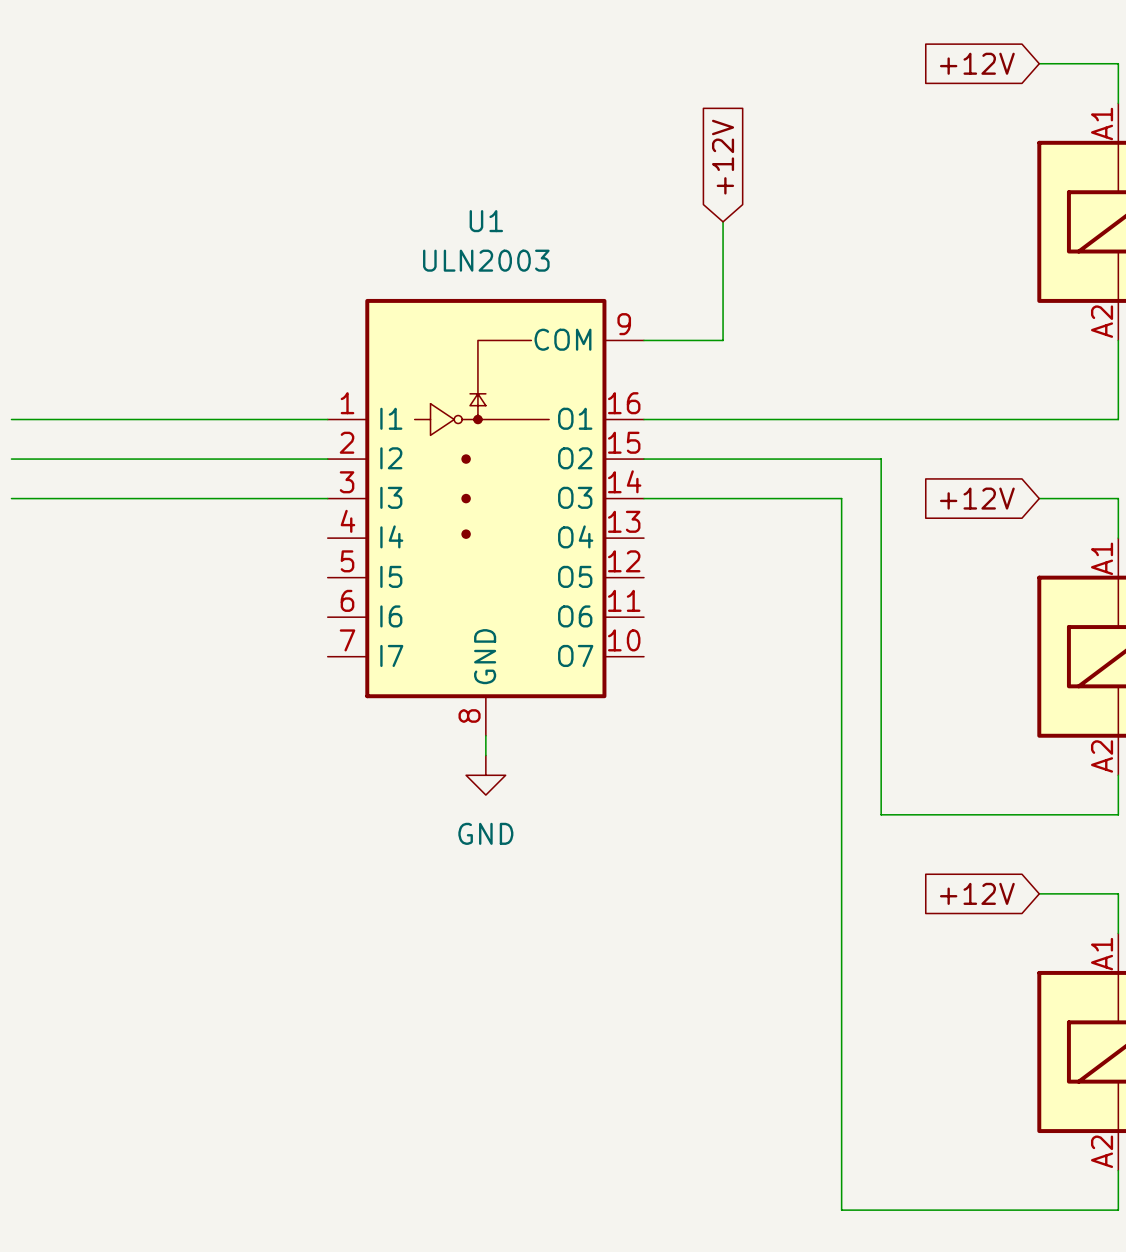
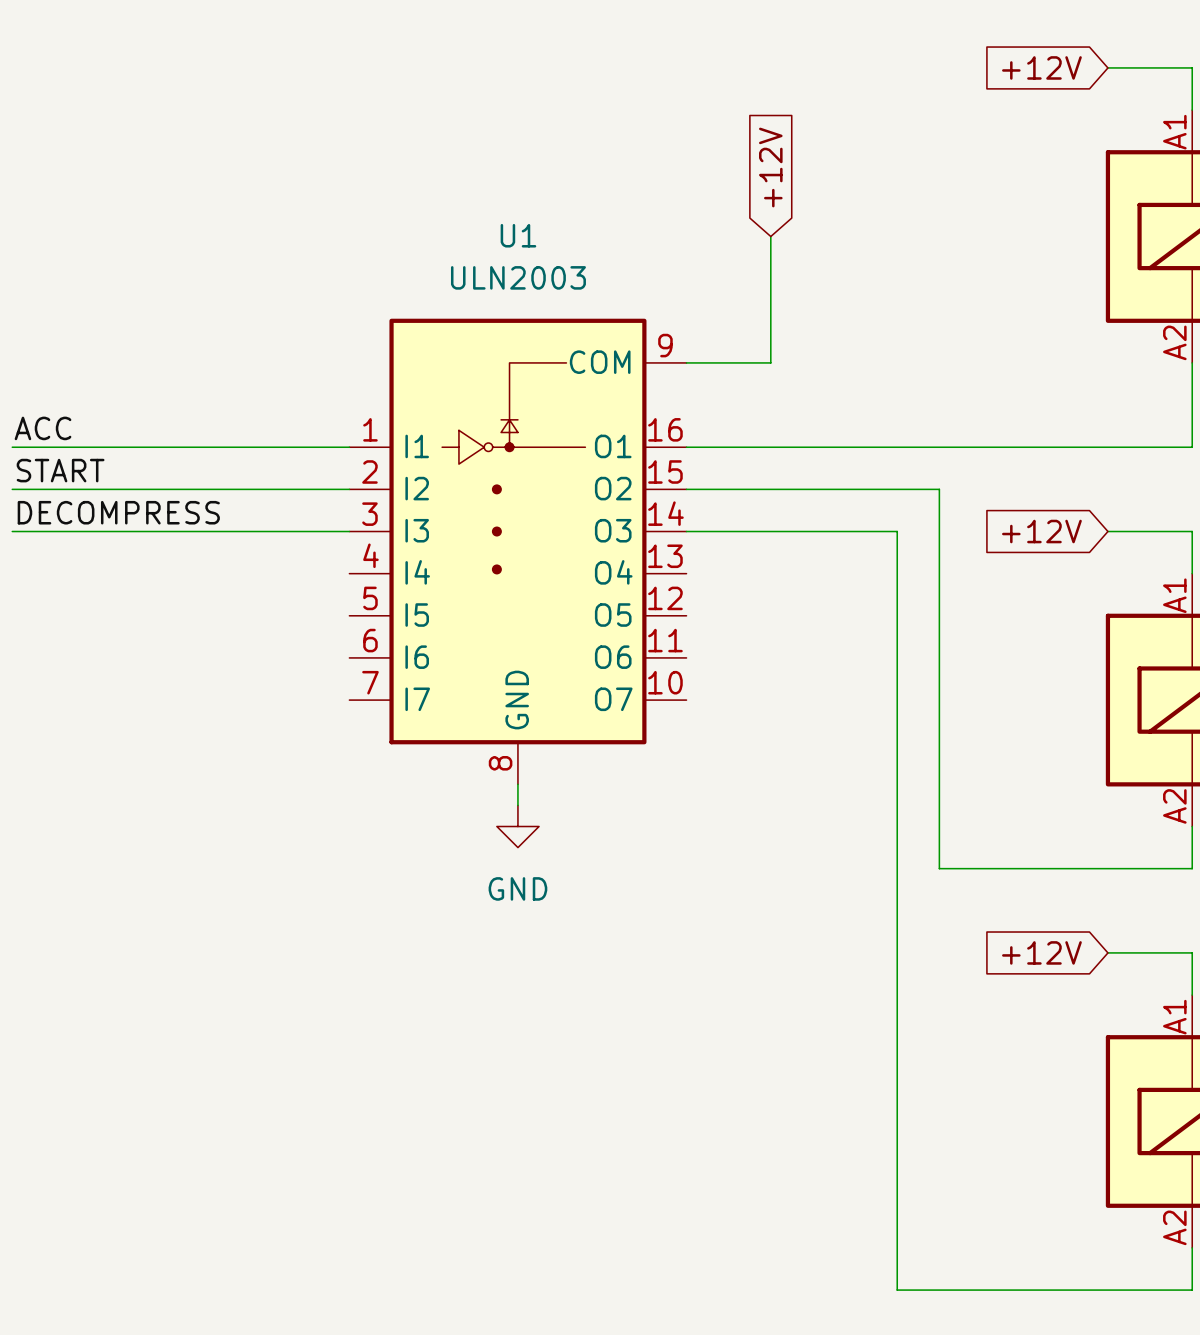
label: none -> ACC (43, 428)
label: none -> START (60, 470)
label: none -> DECOMPRESS (118, 512)

